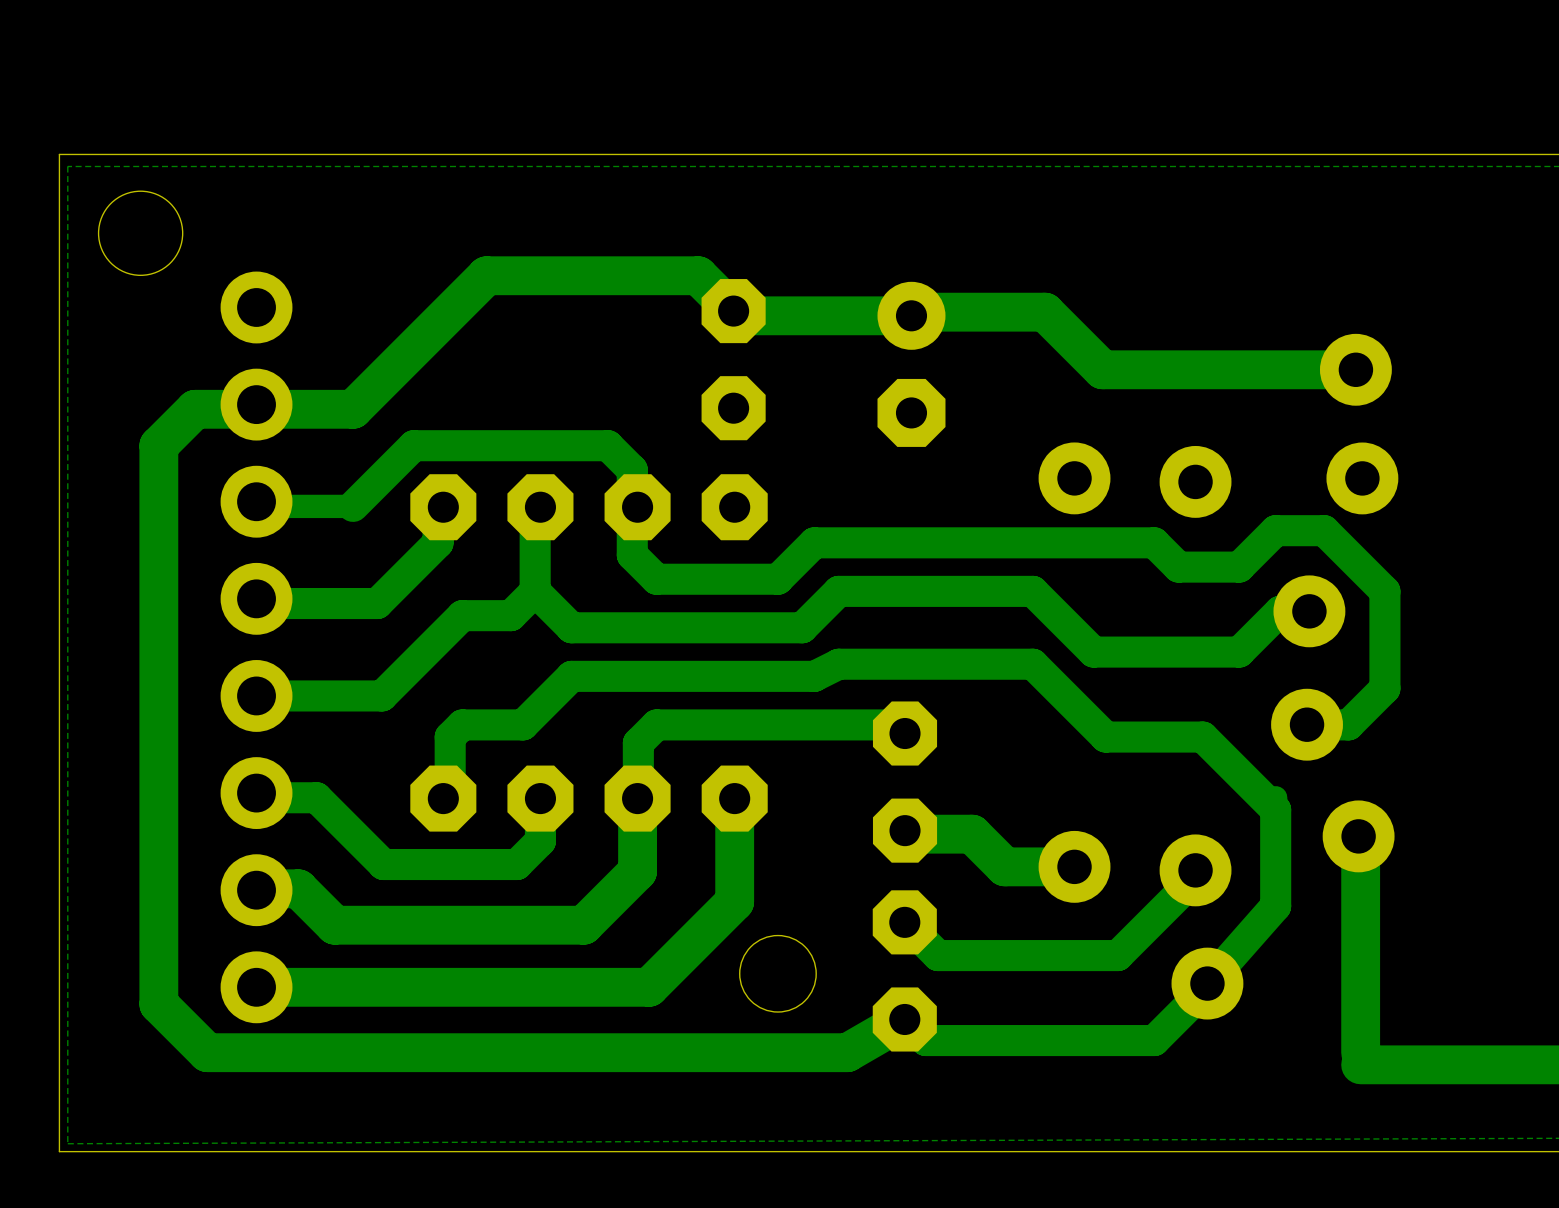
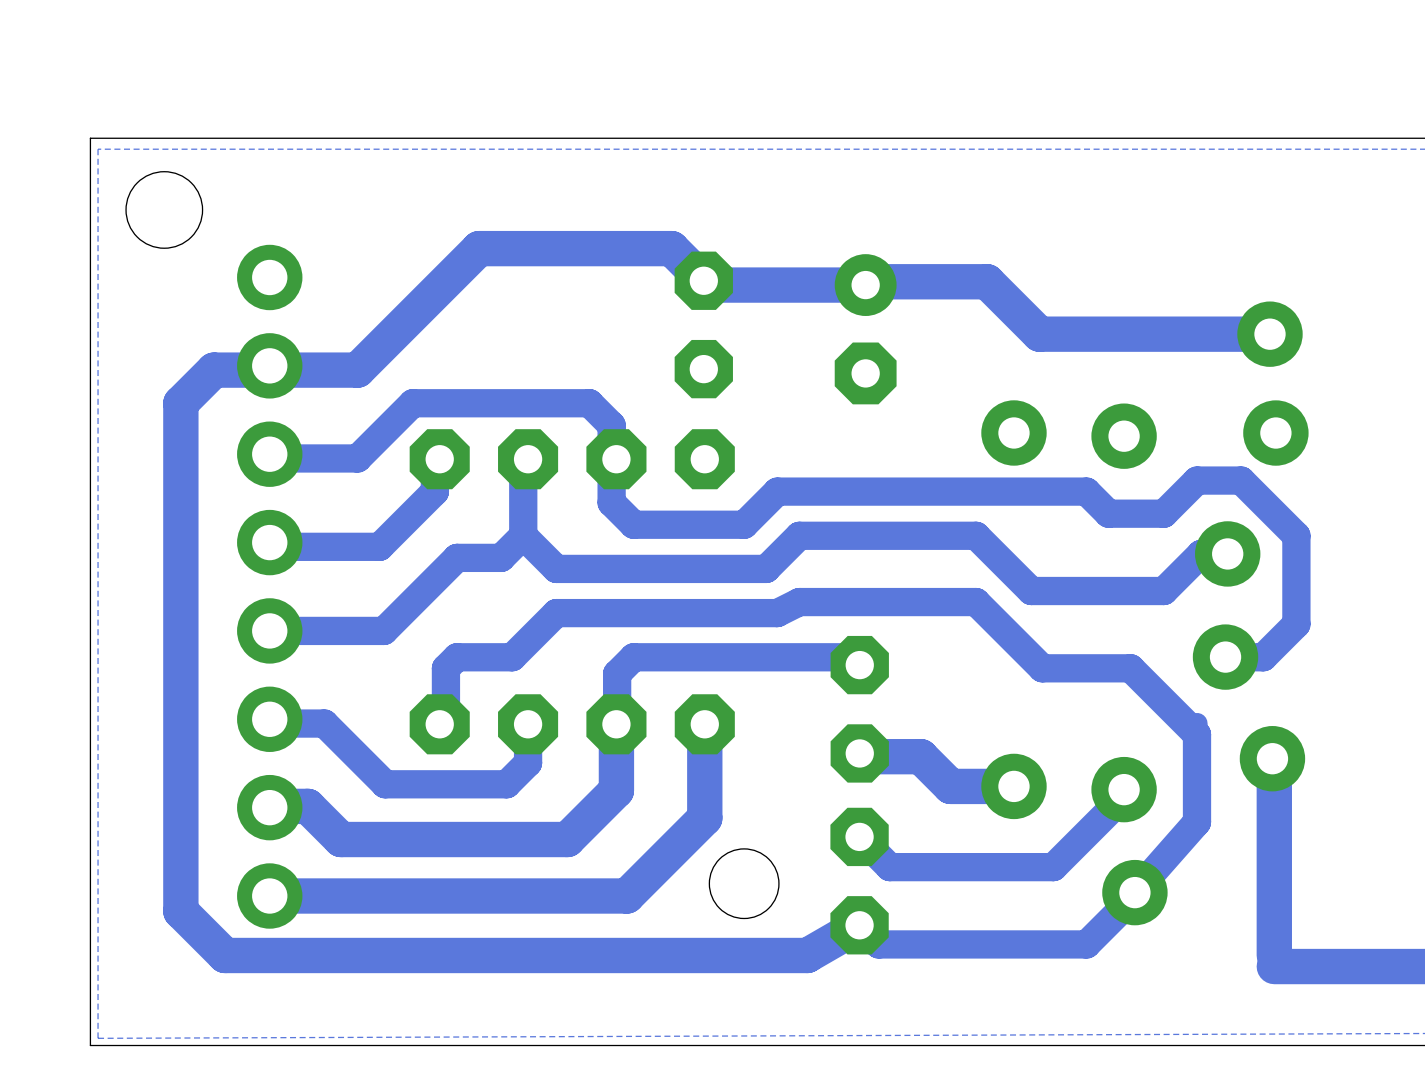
bottom track width: thin (353, 506) (261, 506) -> thick (357, 458) (274, 458)

